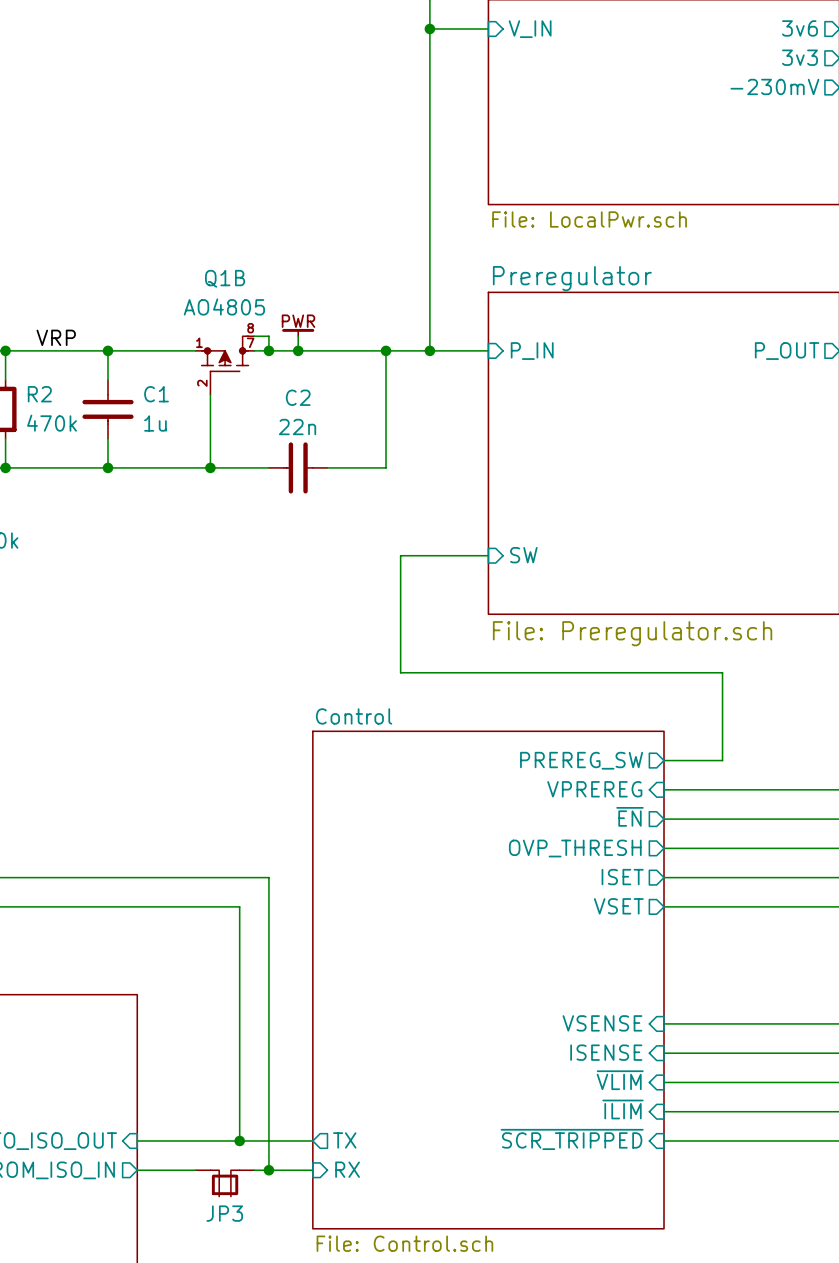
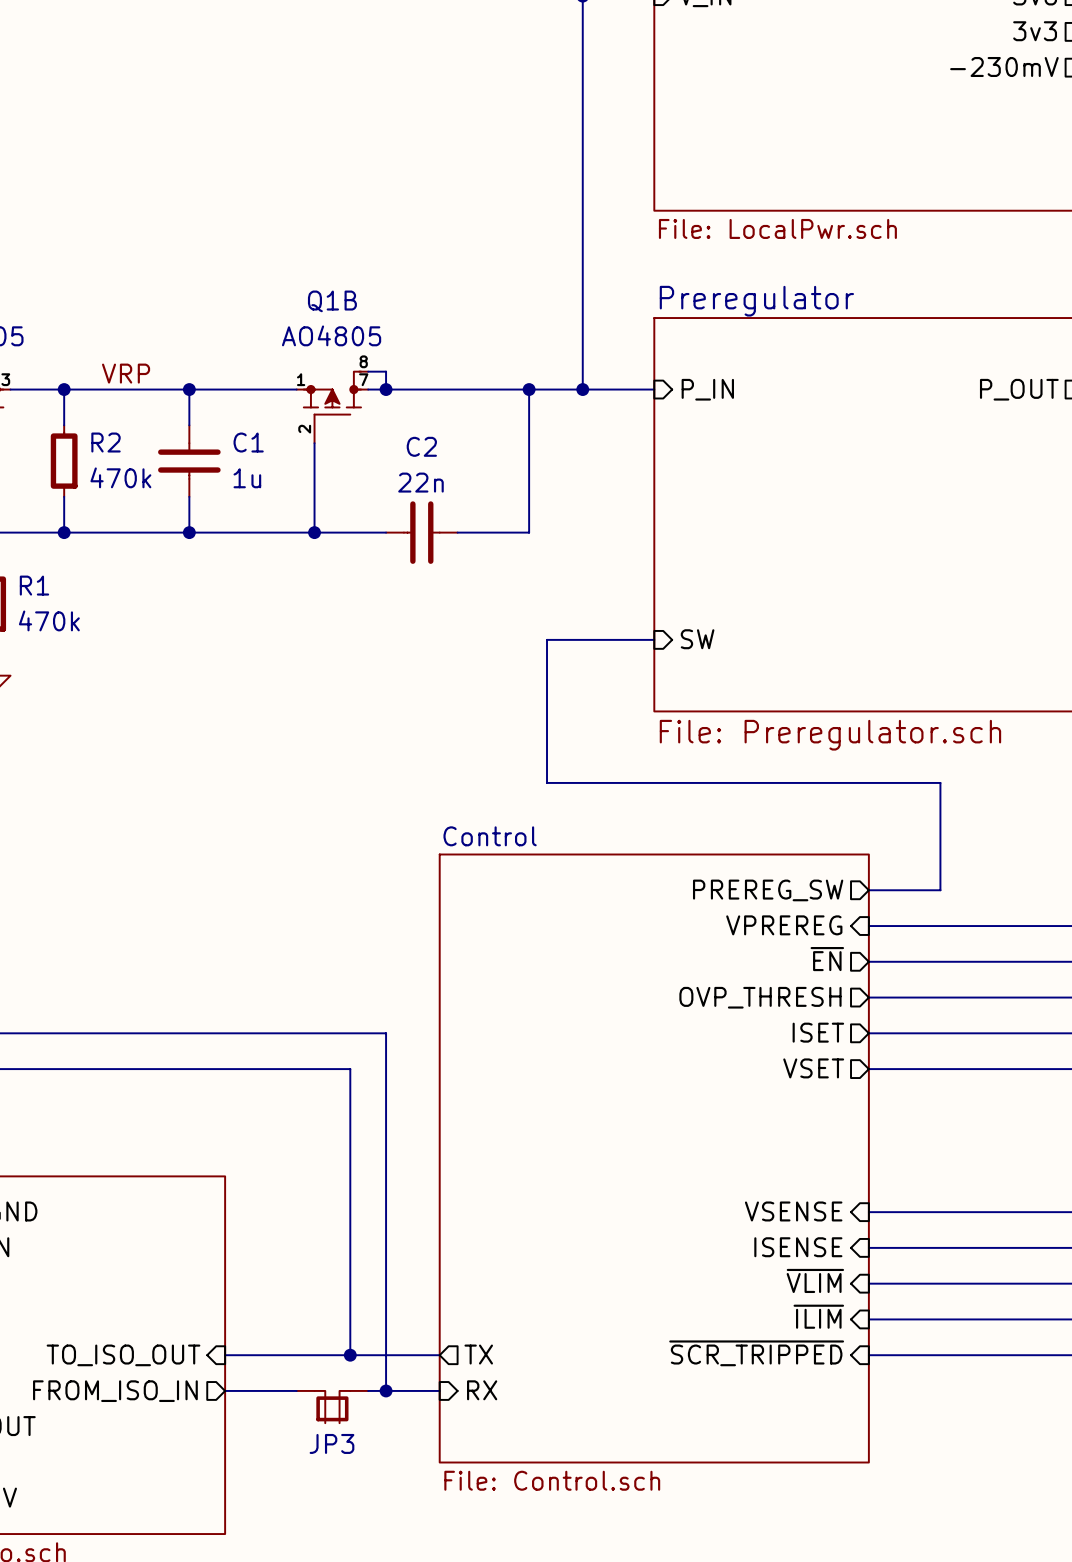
power symbol: (298, 332) -> none
wire: (298, 336) (298, 350) -> none
junction: (298, 350) -> none

